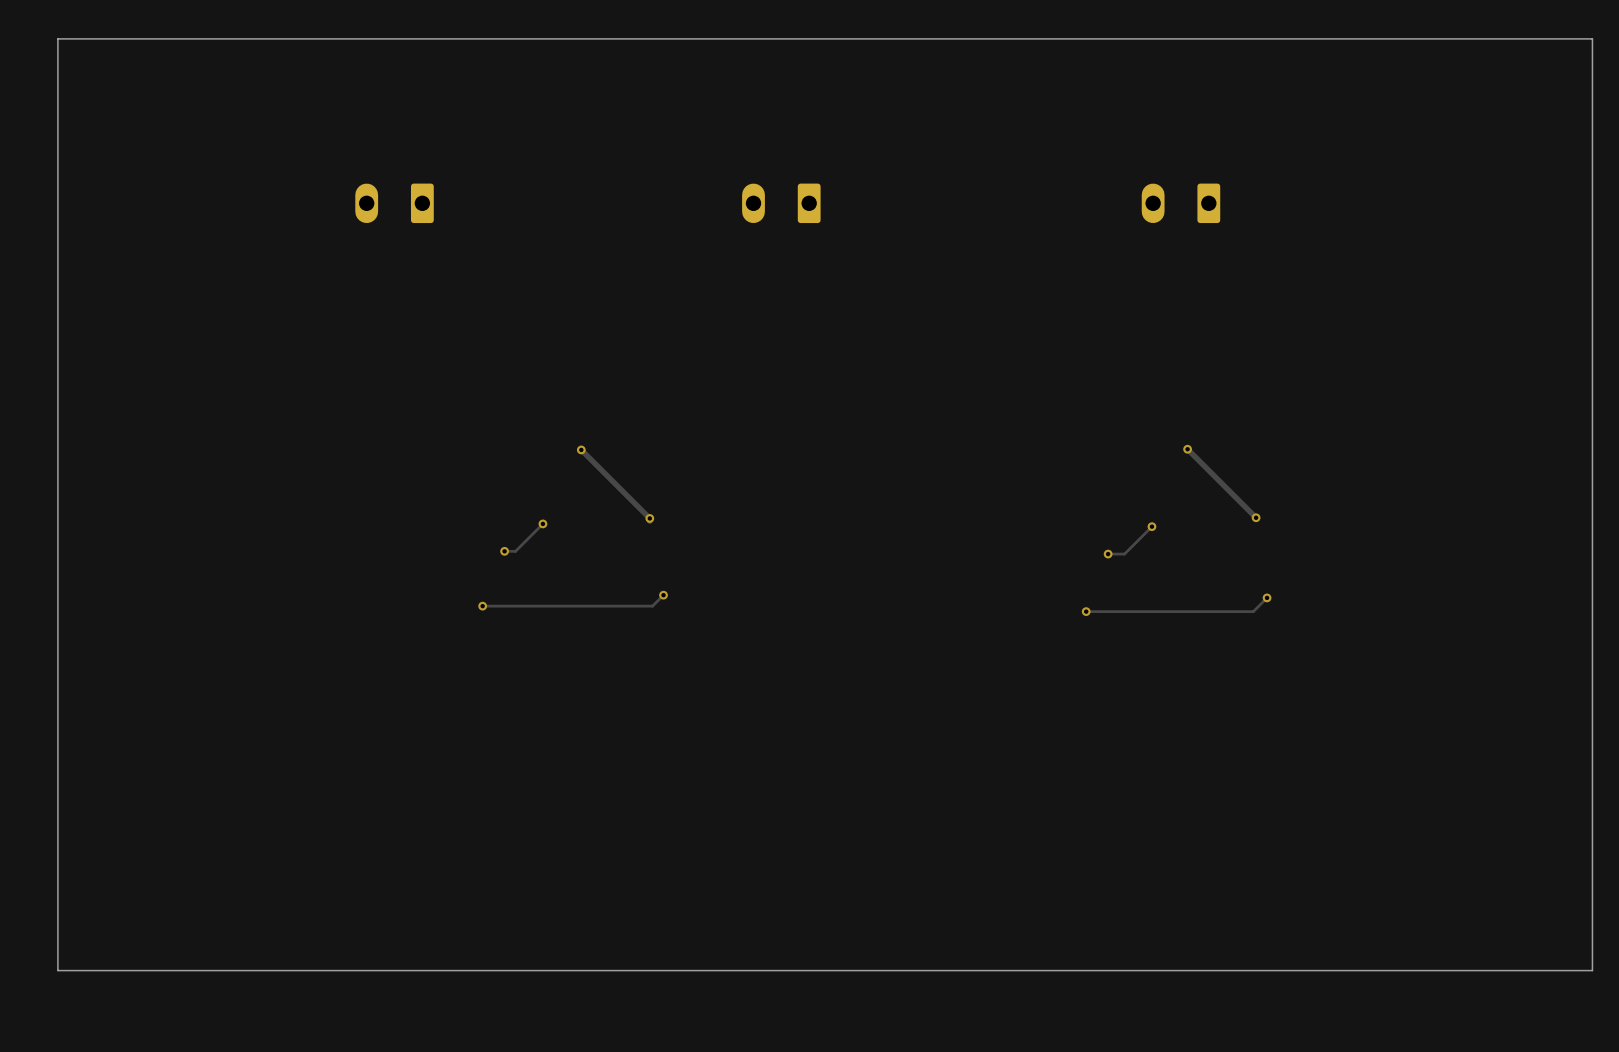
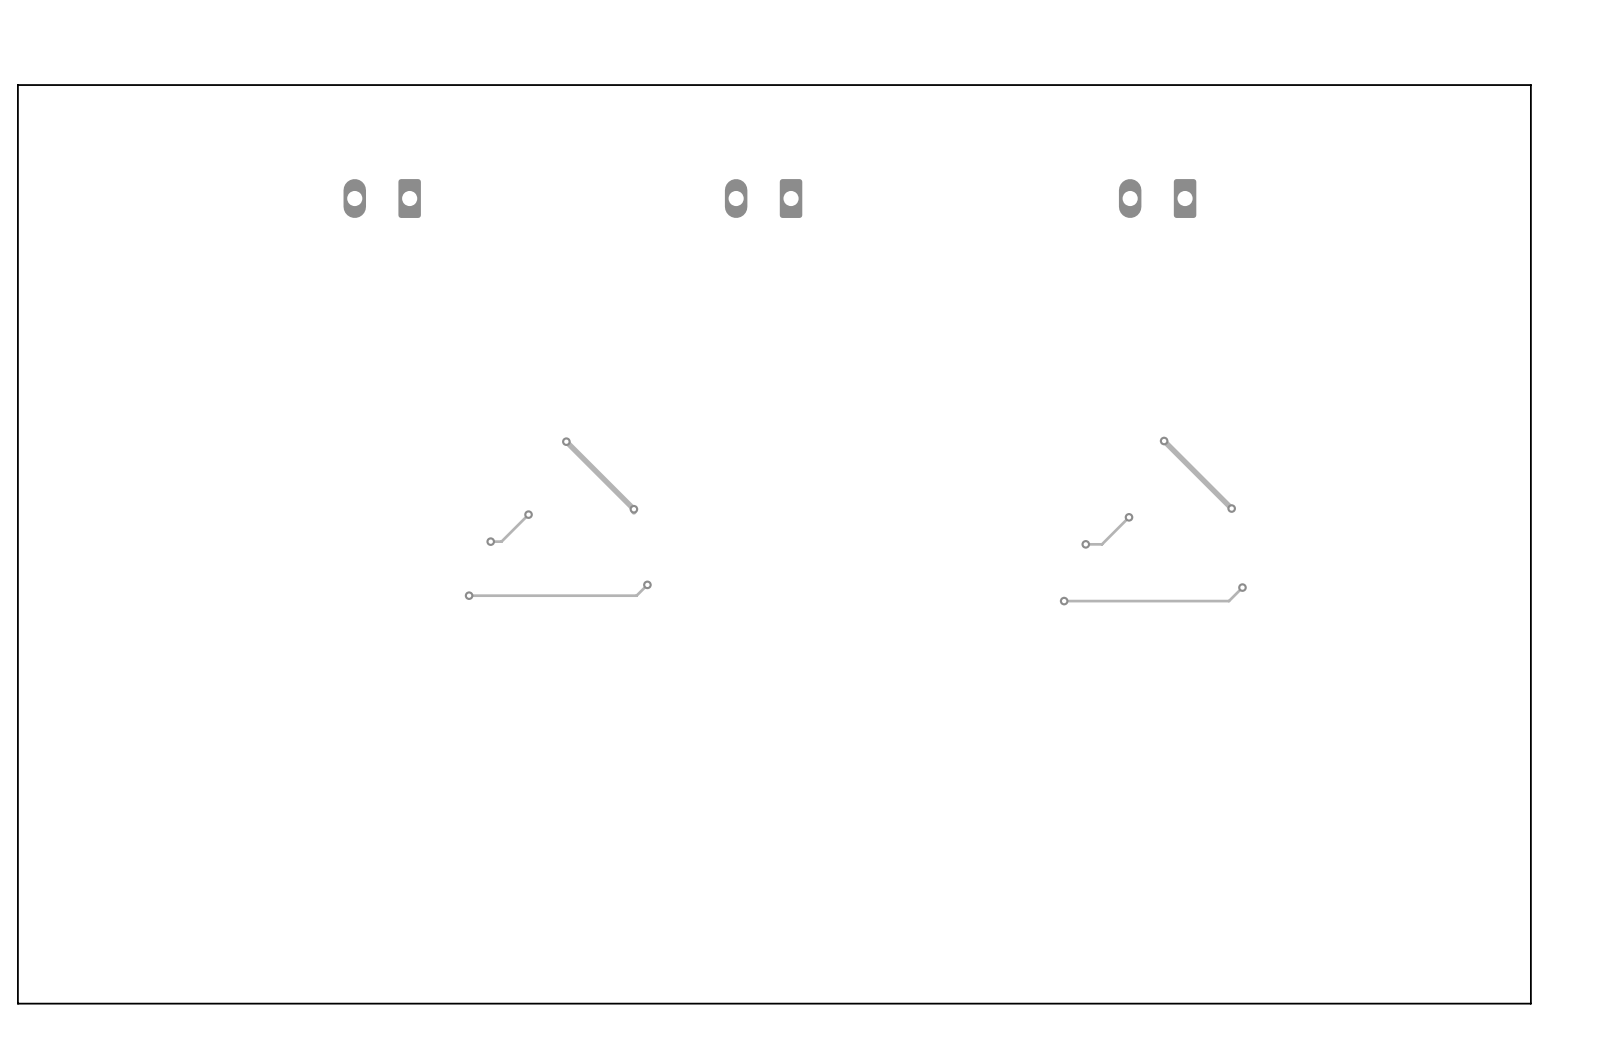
board edge: (1592, 38) (1592, 970) (57, 970) (57, 38) (1592, 38) -> (1530, 85) (1530, 1003) (17, 1003) (17, 85) (1530, 85)

